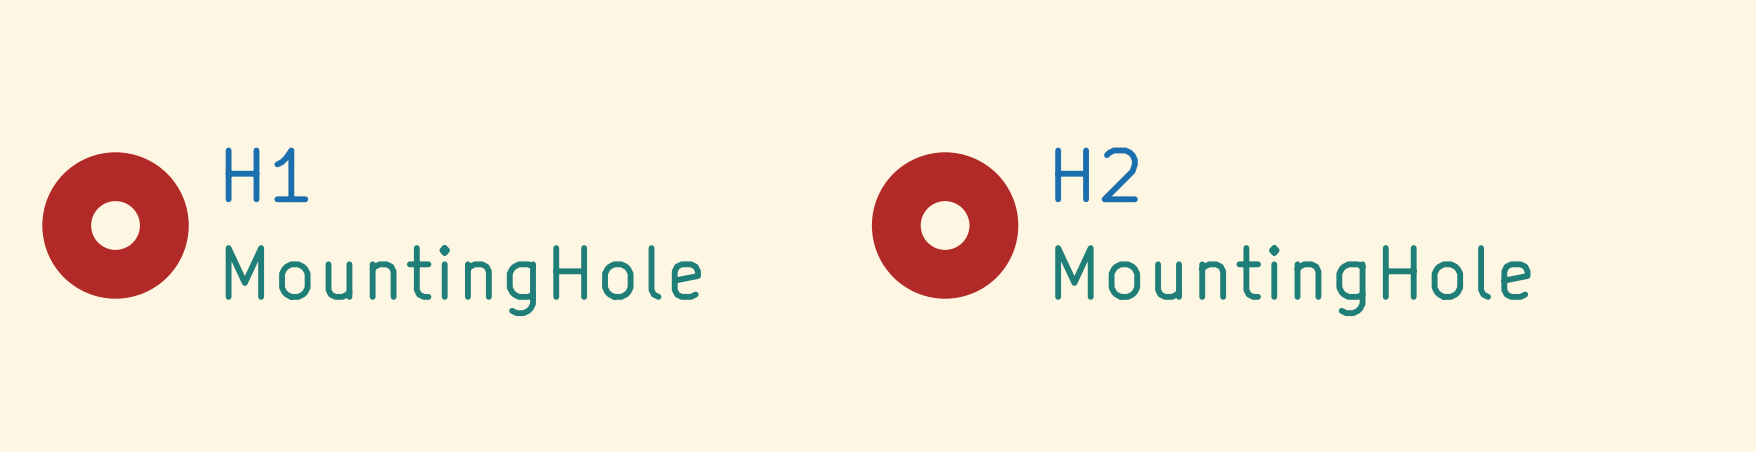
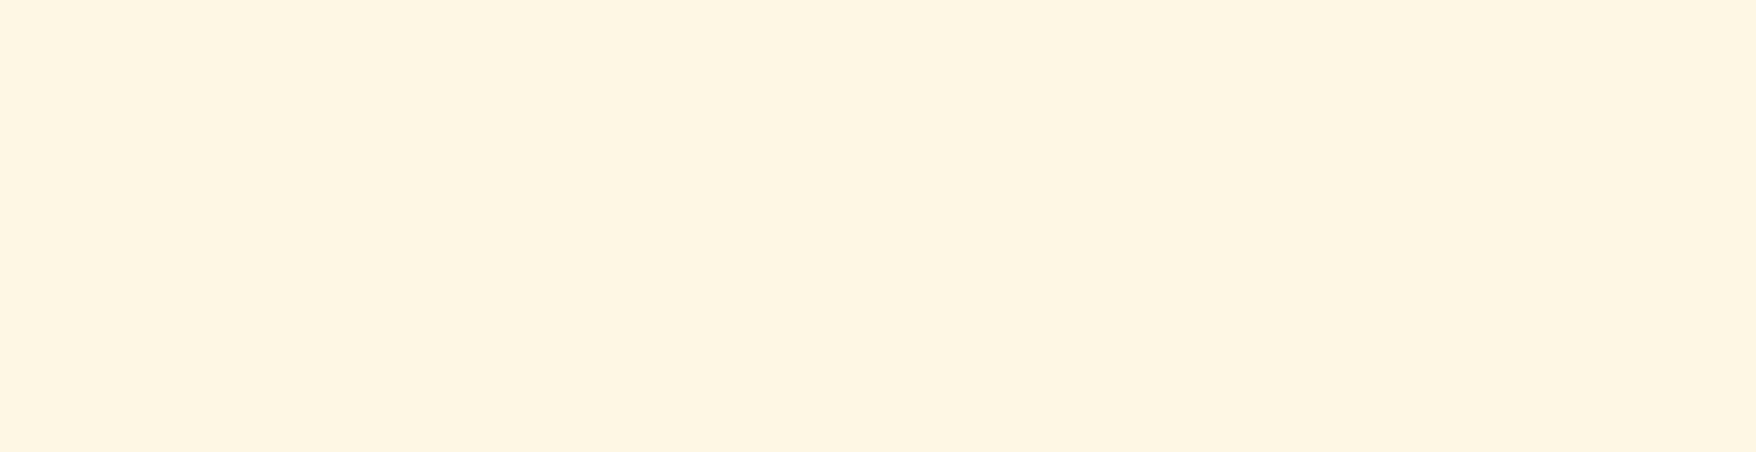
H1: MountingHole (115, 225) -> none
H2: MountingHole (945, 225) -> none

